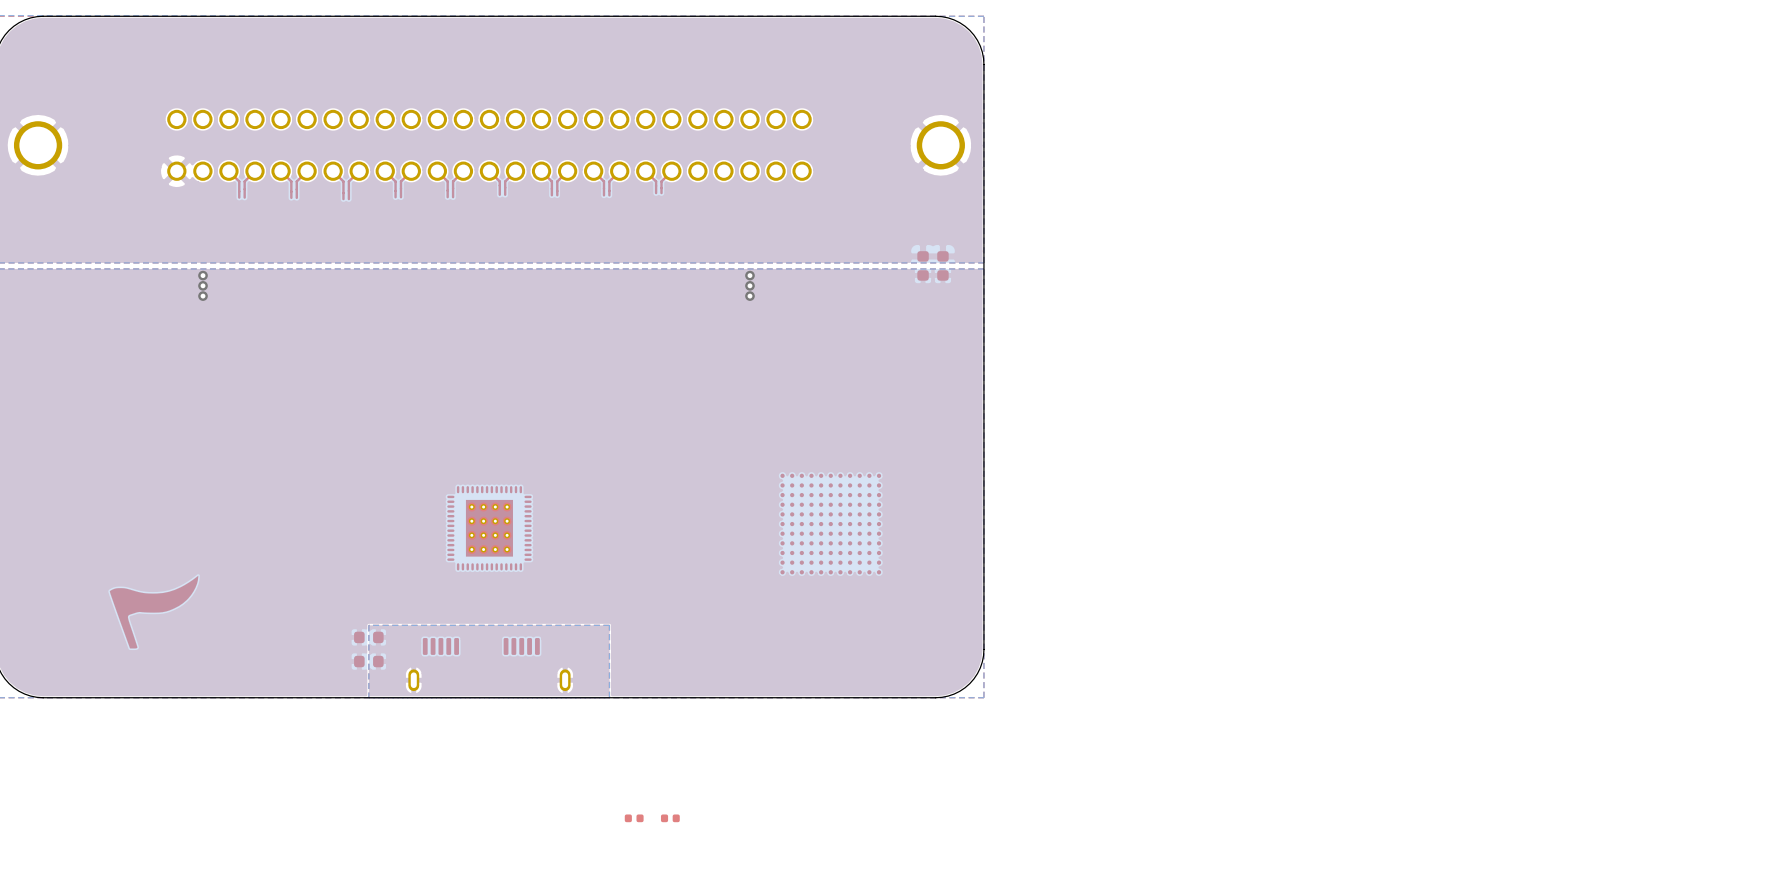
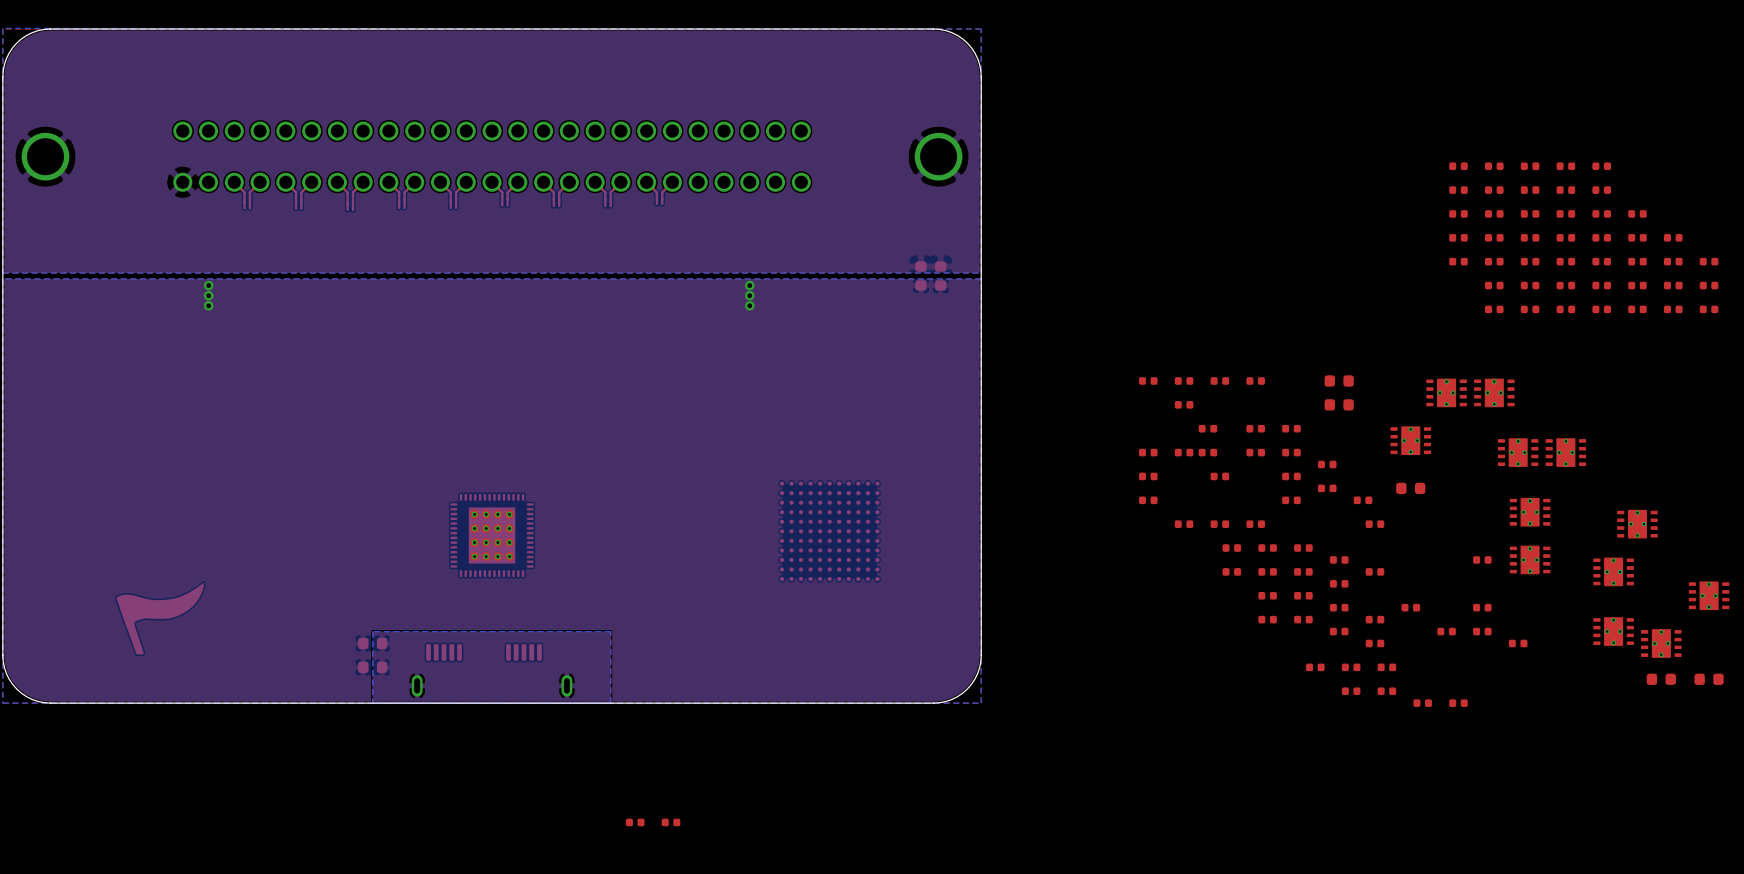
part: none -> (1458, 166)
part: none -> (1494, 166)
part: none -> (1530, 166)
part: none -> (1565, 166)
part: none -> (1601, 166)
part: none -> (1458, 190)
part: none -> (1494, 190)
part: none -> (1530, 190)
part: none -> (1565, 190)
part: none -> (1601, 190)
part: none -> (1458, 213)
part: none -> (1494, 213)
part: none -> (1530, 213)
part: none -> (1565, 213)
part: none -> (1601, 213)
part: none -> (1637, 213)
part: none -> (1458, 237)
part: none -> (1494, 237)
part: none -> (1530, 237)
part: none -> (1565, 237)
part: none -> (1601, 237)
part: none -> (1637, 237)
part: none -> (1673, 237)
part: none -> (1458, 261)
part: none -> (1494, 261)
part: none -> (1530, 261)
part: none -> (1565, 261)
part: none -> (1601, 261)
part: none -> (1637, 261)
part: none -> (1673, 261)
part: none -> (1709, 261)
part: none -> (1494, 285)
part: none -> (1530, 285)
part: none -> (1565, 285)
part: none -> (1601, 285)
part: none -> (1637, 285)
part: none -> (1673, 285)
part: none -> (1709, 285)
part: none -> (1494, 309)
part: none -> (1530, 309)
part: none -> (1565, 309)
part: none -> (1601, 309)
part: none -> (1637, 309)
part: none -> (1673, 309)
part: none -> (1709, 309)
part: none -> (1148, 380)
part: none -> (1184, 380)
part: none -> (1219, 380)
part: none -> (1255, 380)
part: none -> (1339, 380)
part: none -> (1446, 392)
part: none -> (1494, 392)
part: none -> (1184, 404)
part: none -> (1339, 404)
part: none -> (1207, 428)
part: none -> (1255, 428)
part: none -> (1291, 428)
part: none -> (1410, 440)
part: none -> (1148, 452)
part: none -> (1184, 452)
part: none -> (1207, 452)
part: none -> (1255, 452)
part: none -> (1291, 452)
part: none -> (1518, 452)
part: none -> (1565, 452)
part: none -> (1327, 464)
part: none -> (1148, 476)
part: none -> (1219, 476)
part: none -> (1291, 476)
part: none -> (1327, 488)
part: none -> (1410, 488)
part: none -> (1148, 500)
part: none -> (1291, 500)
part: none -> (1363, 500)
part: none -> (1530, 512)
part: none -> (1184, 524)
part: none -> (1219, 524)
part: none -> (1255, 524)
part: none -> (1374, 524)
part: none -> (1637, 524)
part: none -> (1231, 548)
part: none -> (1267, 548)
part: none -> (1303, 548)
part: none -> (1339, 559)
part: none -> (1482, 559)
part: none -> (1530, 559)
part: none -> (1231, 571)
part: none -> (1267, 571)
part: none -> (1303, 571)
part: none -> (1374, 571)
part: none -> (1613, 571)
part: none -> (1339, 583)
part: none -> (1267, 595)
part: none -> (1303, 595)
part: none -> (1709, 595)
part: none -> (1339, 607)
part: none -> (1410, 607)
part: none -> (1482, 607)
part: none -> (1267, 619)
part: none -> (1303, 619)
part: none -> (1374, 619)
part: none -> (1339, 631)
part: none -> (1446, 631)
part: none -> (1482, 631)
part: none -> (1613, 631)
part: none -> (1374, 643)
part: none -> (1518, 643)
part: none -> (1661, 643)
part: none -> (1315, 667)
part: none -> (1351, 667)
part: none -> (1386, 667)
part: none -> (1661, 679)
part: none -> (1709, 679)
part: none -> (1351, 691)
part: none -> (1386, 691)
part: none -> (1422, 703)
part: none -> (1458, 703)

